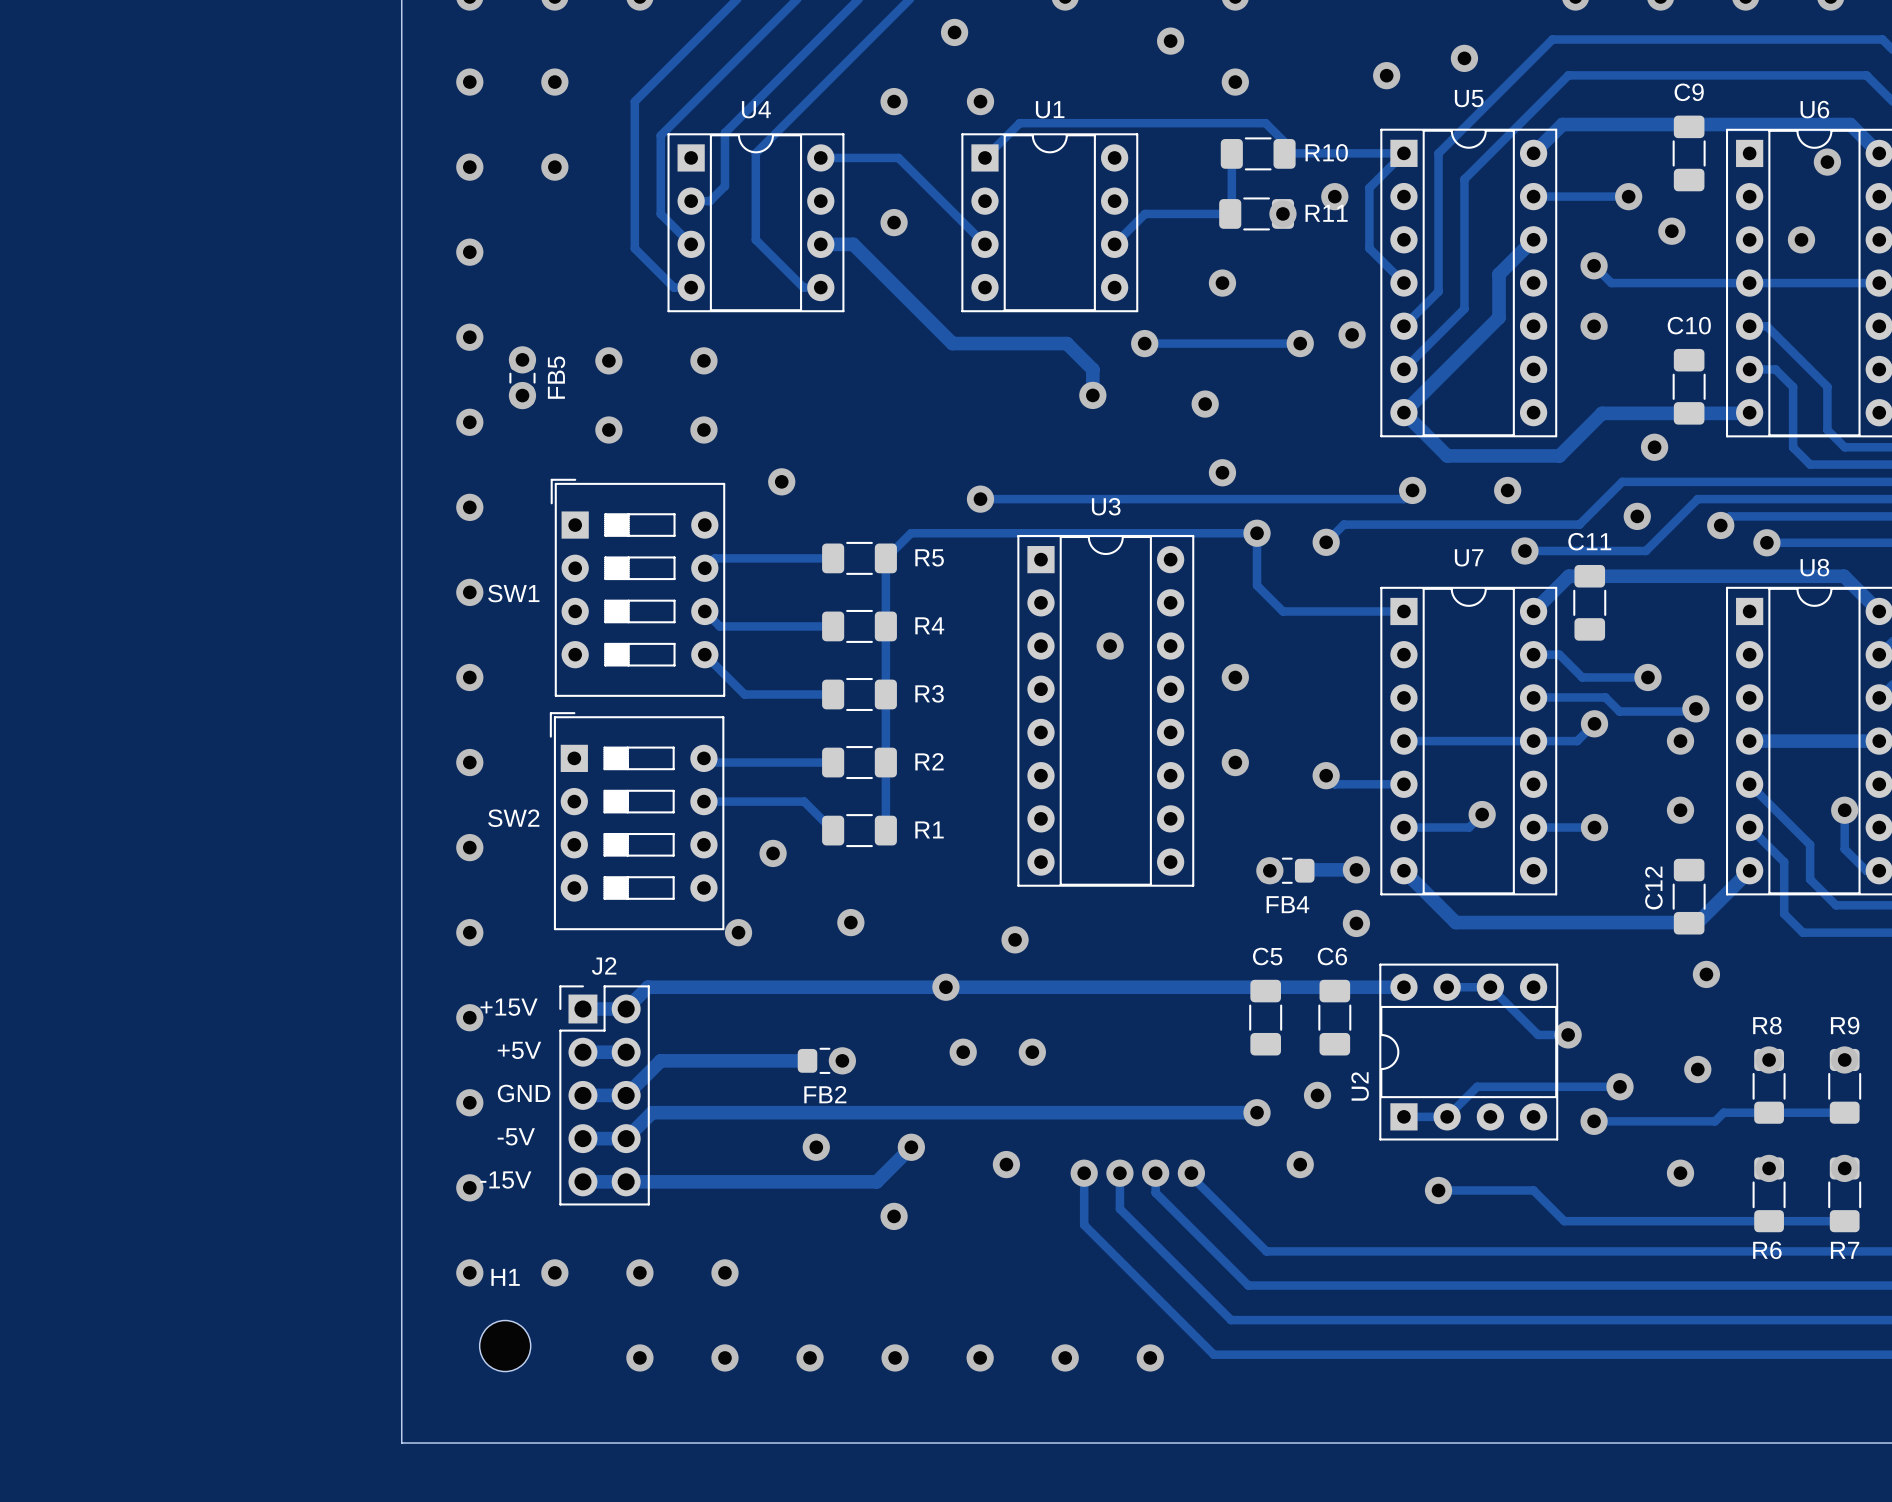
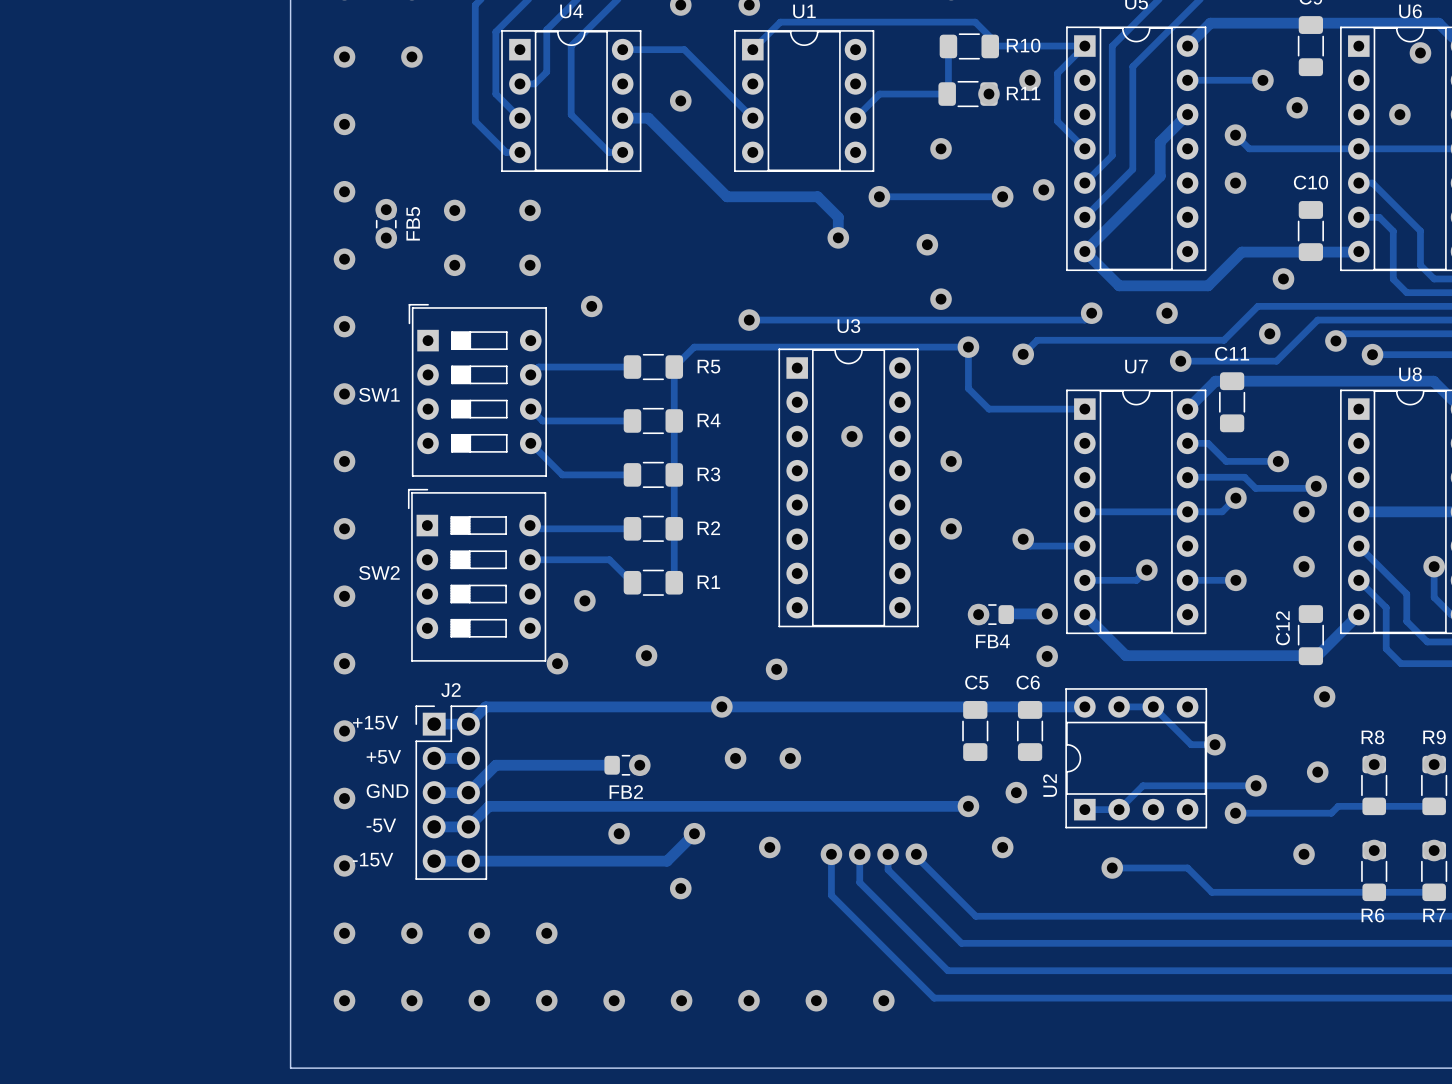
H1: (505, 1346) -> none
via: none -> (344, 1000)
via: none -> (411, 1000)

